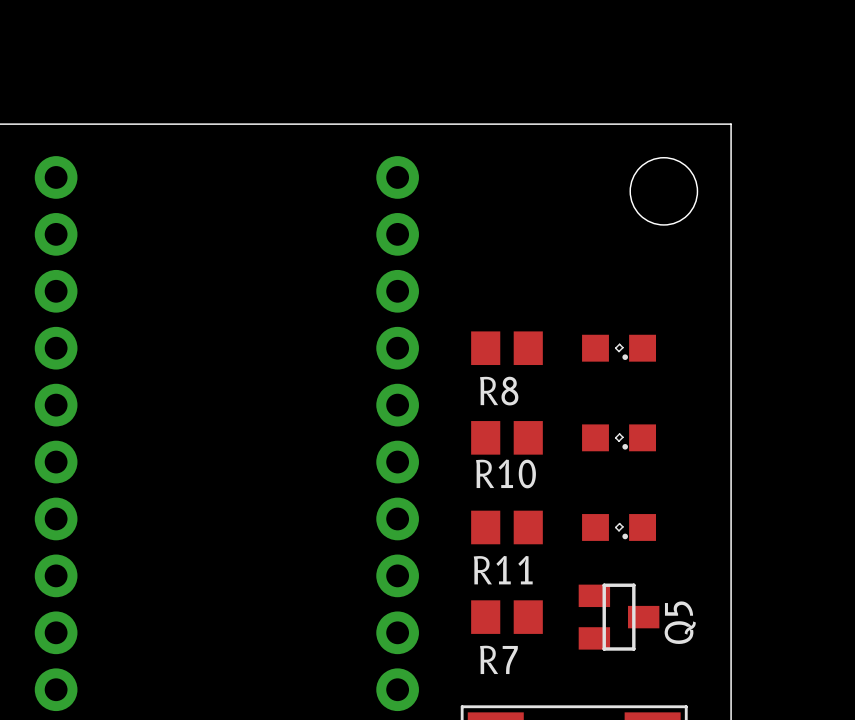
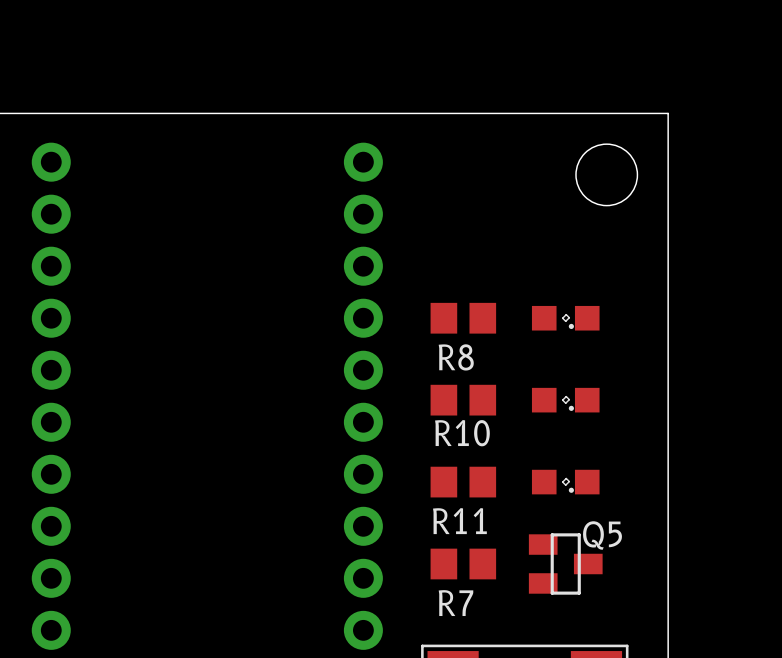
Q5 name rotation: 0° (680, 622) -> 90° clockwise (602, 535)

